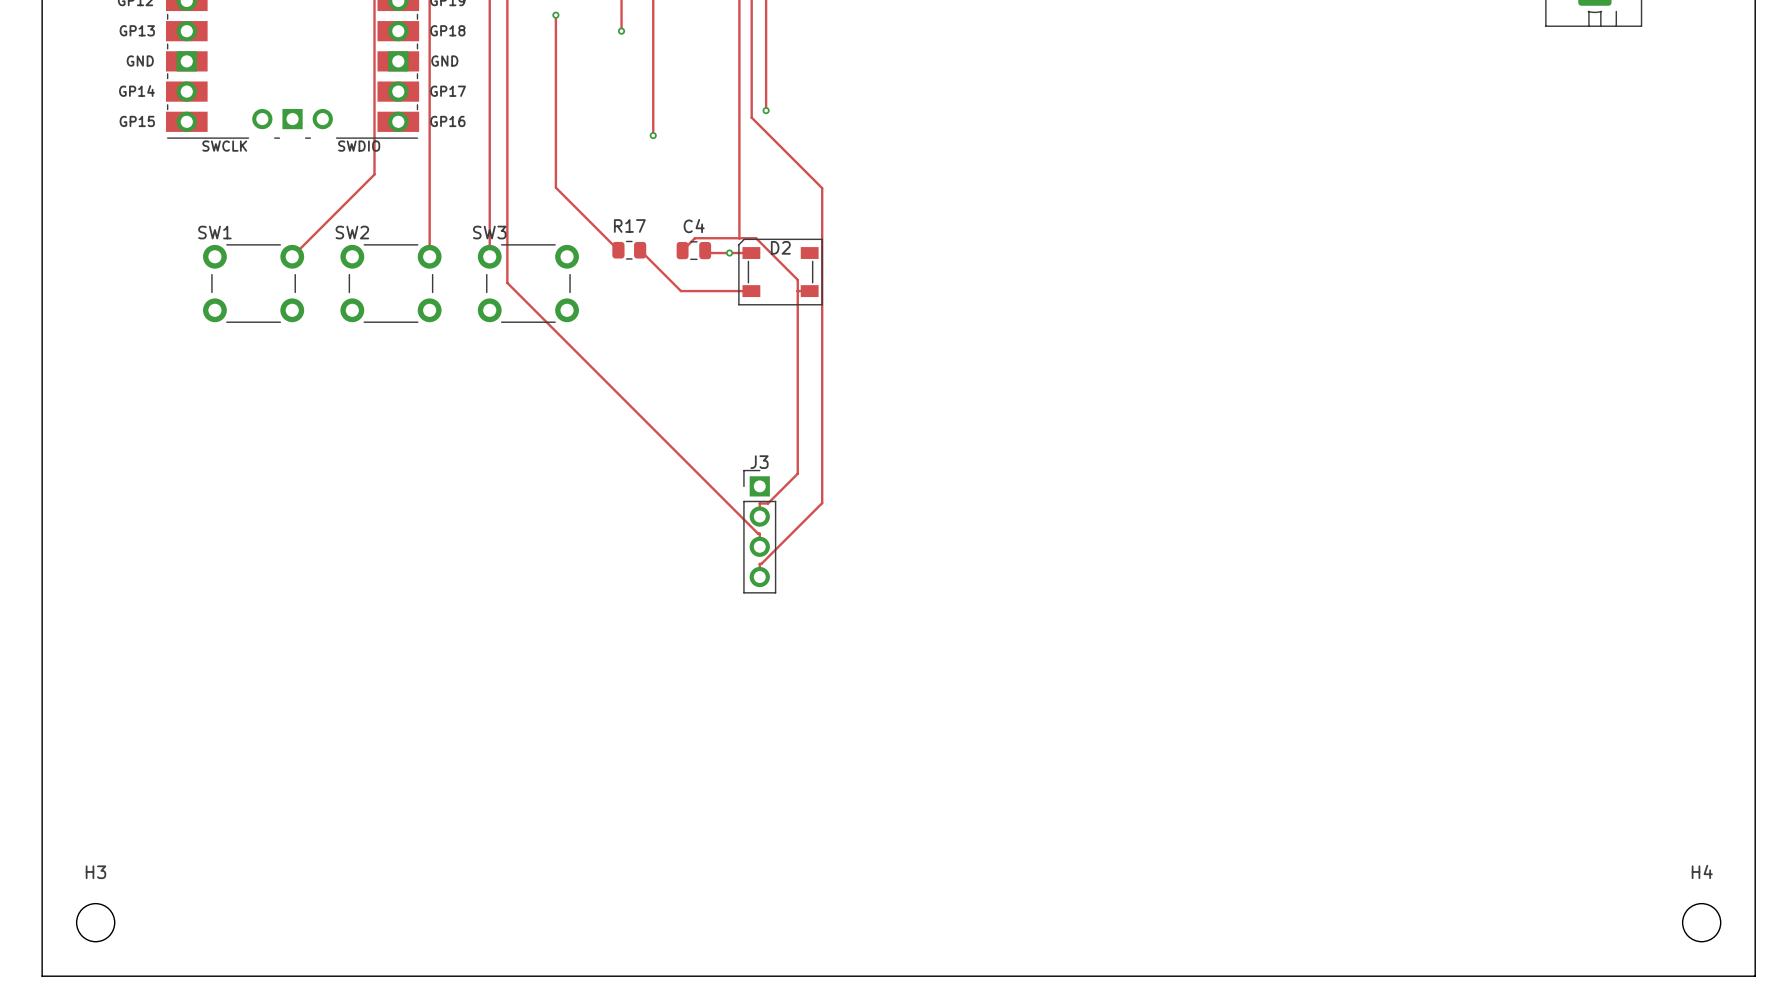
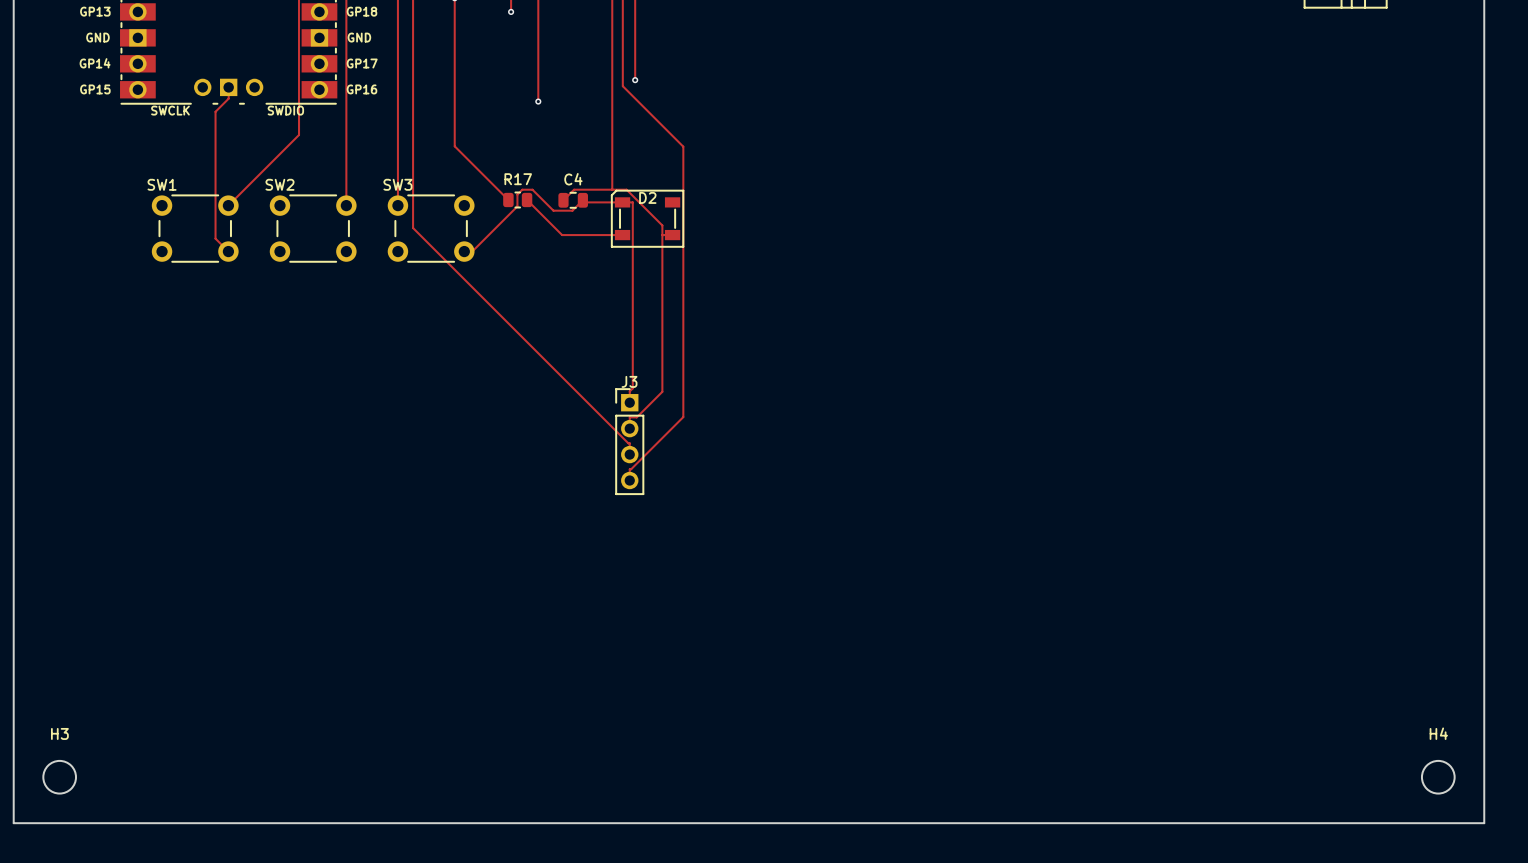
track: none -> (228, 87) (228, 98) (215, 111) (215, 238) (228, 251)
track: none -> (582, 200) (572, 210) (553, 210) (532, 189) (522, 189) (517, 194) (517, 206) (472, 251) (464, 251)
via: (729, 253) -> none
track: none -> (622, 202) (632, 202) (632, 388) (629, 391) (629, 402)

